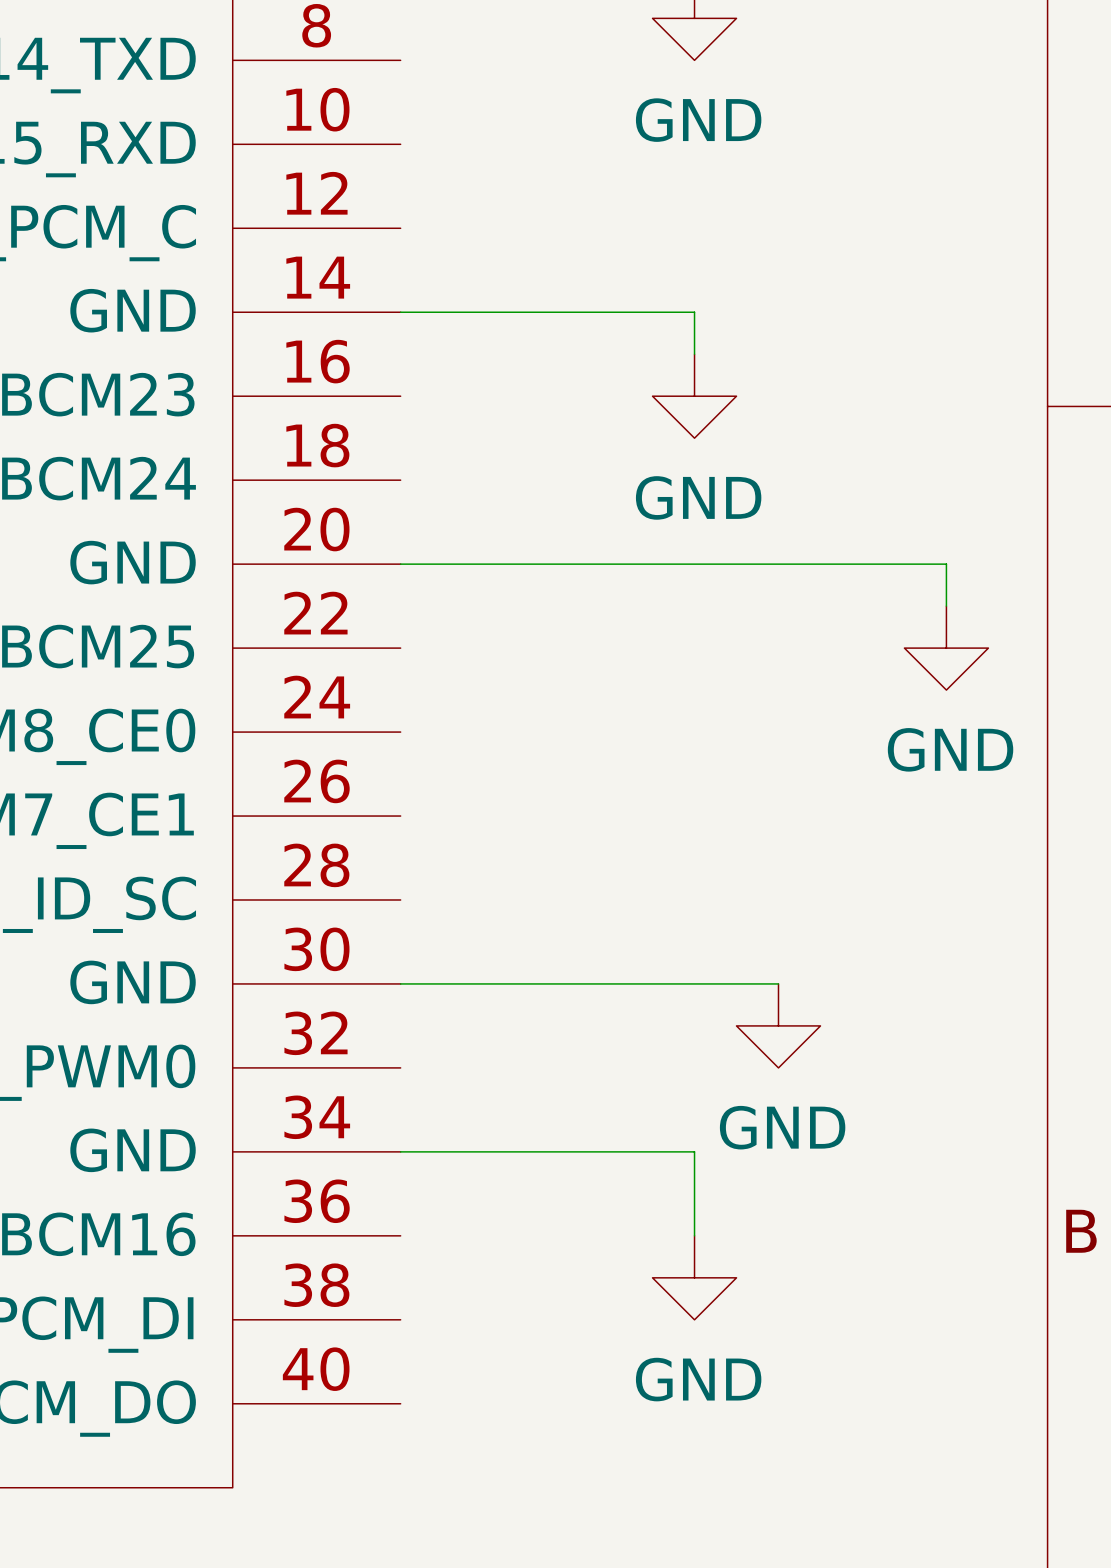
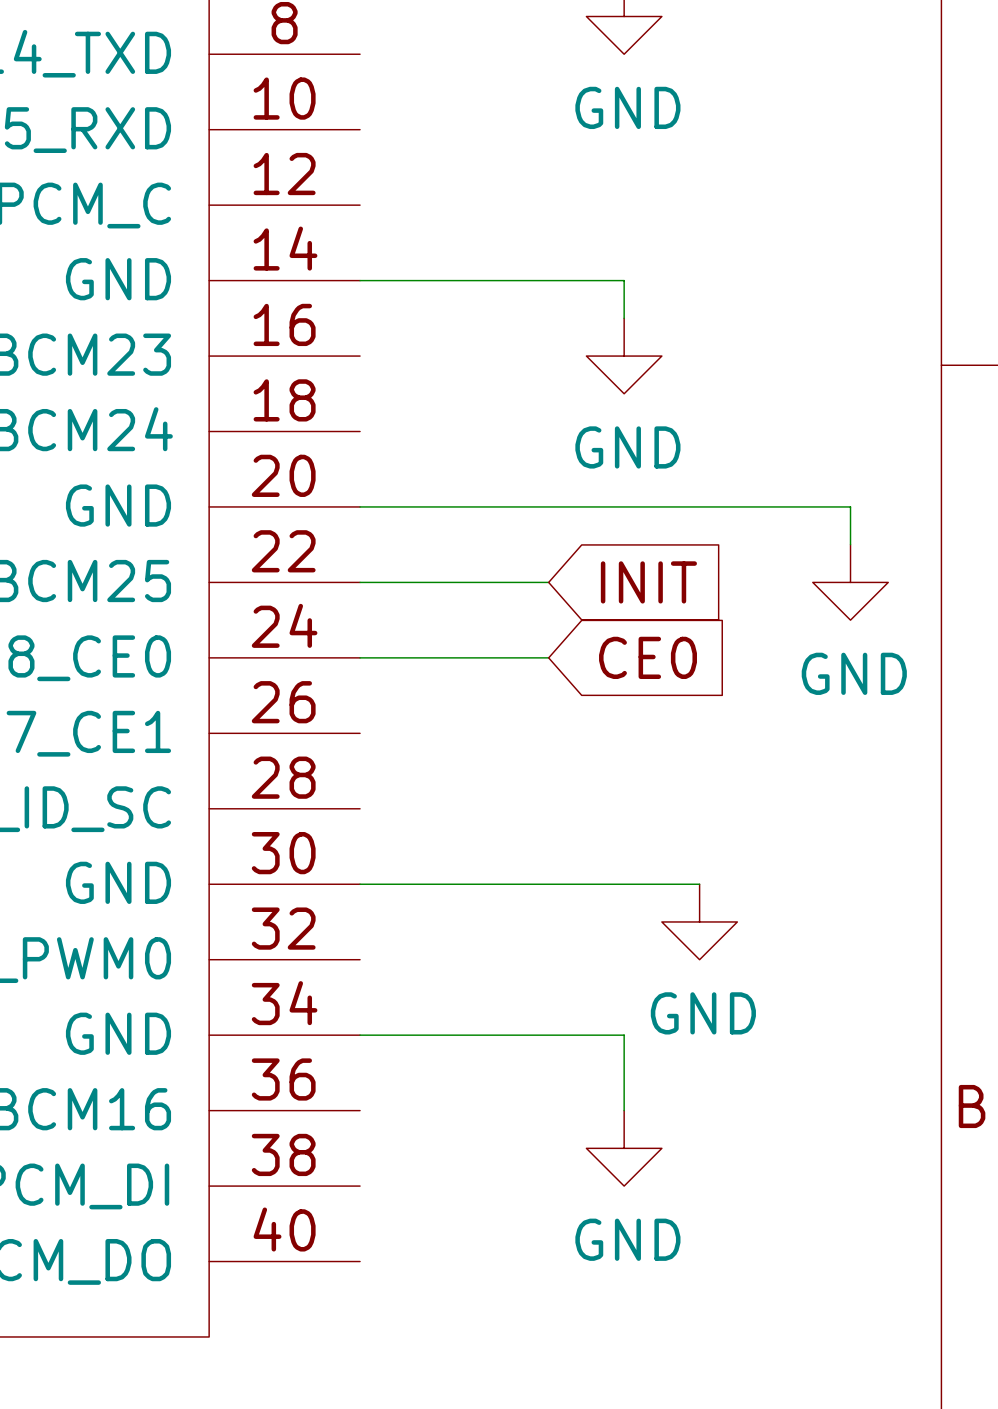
wire: none -> (360, 582) (548, 582)
global label: none -> INIT (648, 582)
wire: none -> (360, 657) (548, 657)
global label: none -> CE0 (648, 657)

